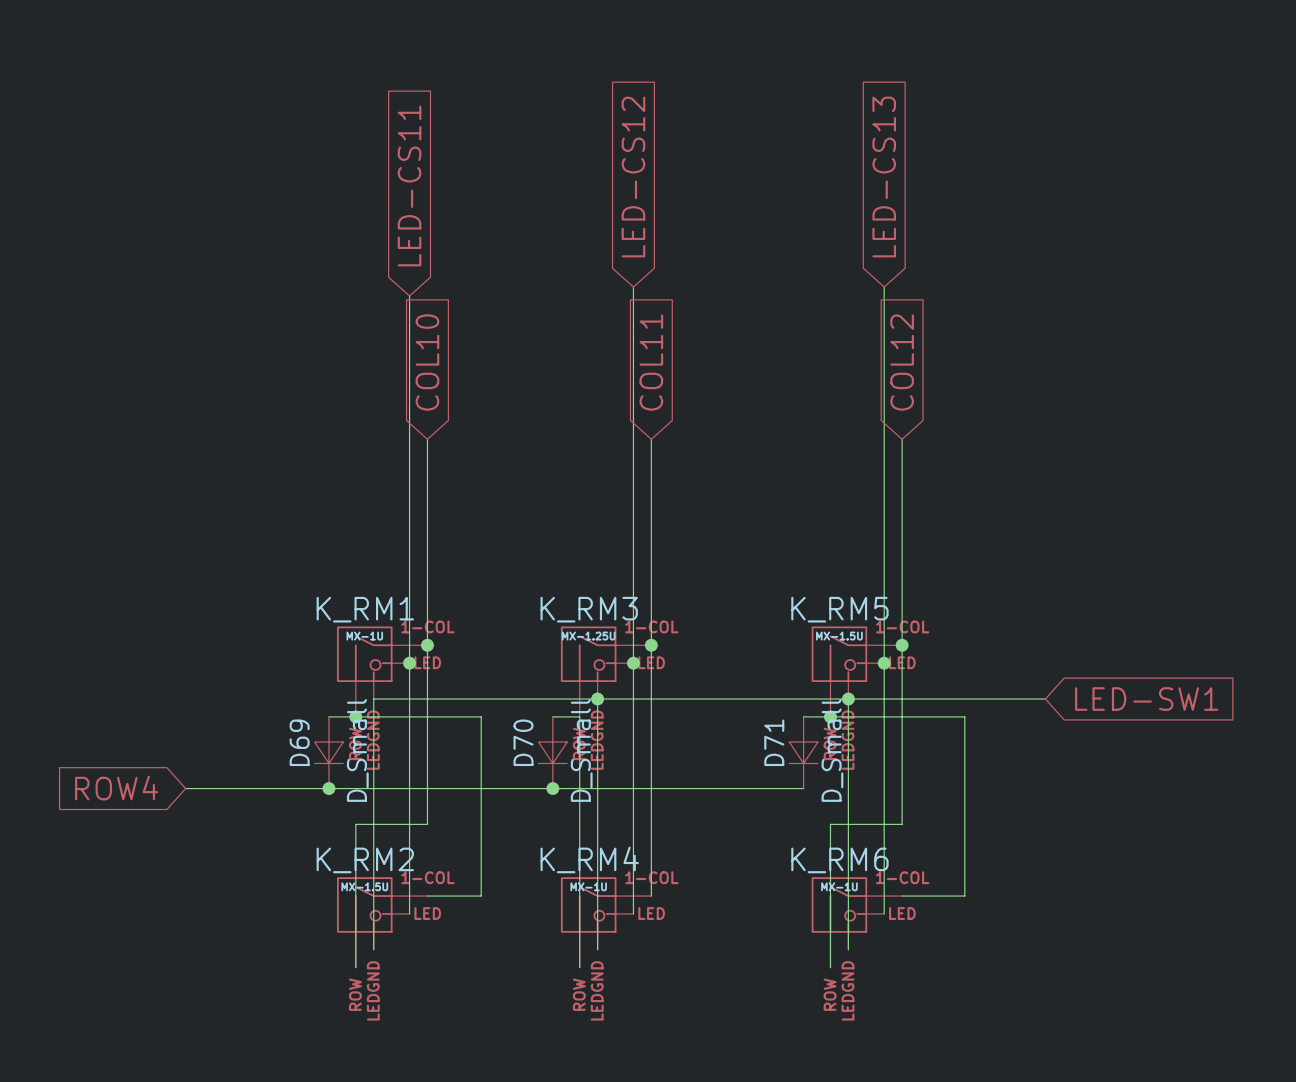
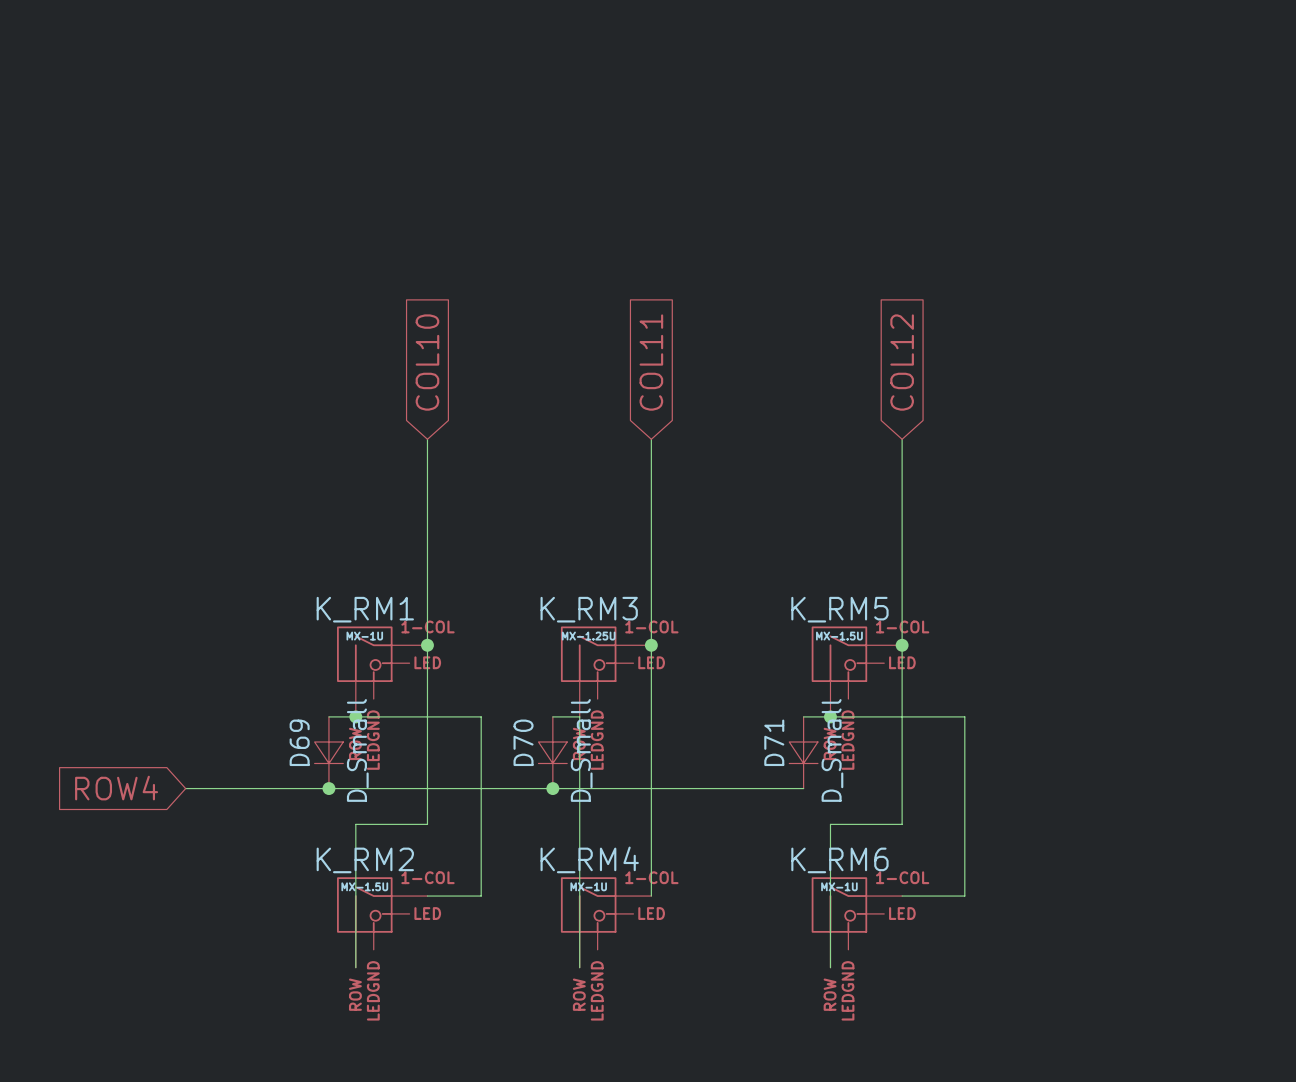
global label: LED-CS12 (633, 177) -> none
global label: LED-CS13 (884, 177) -> none
global label: LED-CS11 (409, 185) -> none
wire: (633, 287) (633, 913) -> none
wire: (884, 287) (884, 913) -> none
wire: (409, 296) (409, 913) -> none
junction: (409, 663) -> none
junction: (633, 663) -> none
junction: (884, 663) -> none
wire: (597, 699) (597, 949) -> none
junction: (597, 699) -> none
wire: (848, 699) (848, 949) -> none
junction: (848, 699) -> none
wire: (1045, 699) (373, 699) (373, 949) -> none
global label: LED-SW1 (1146, 699) -> none

